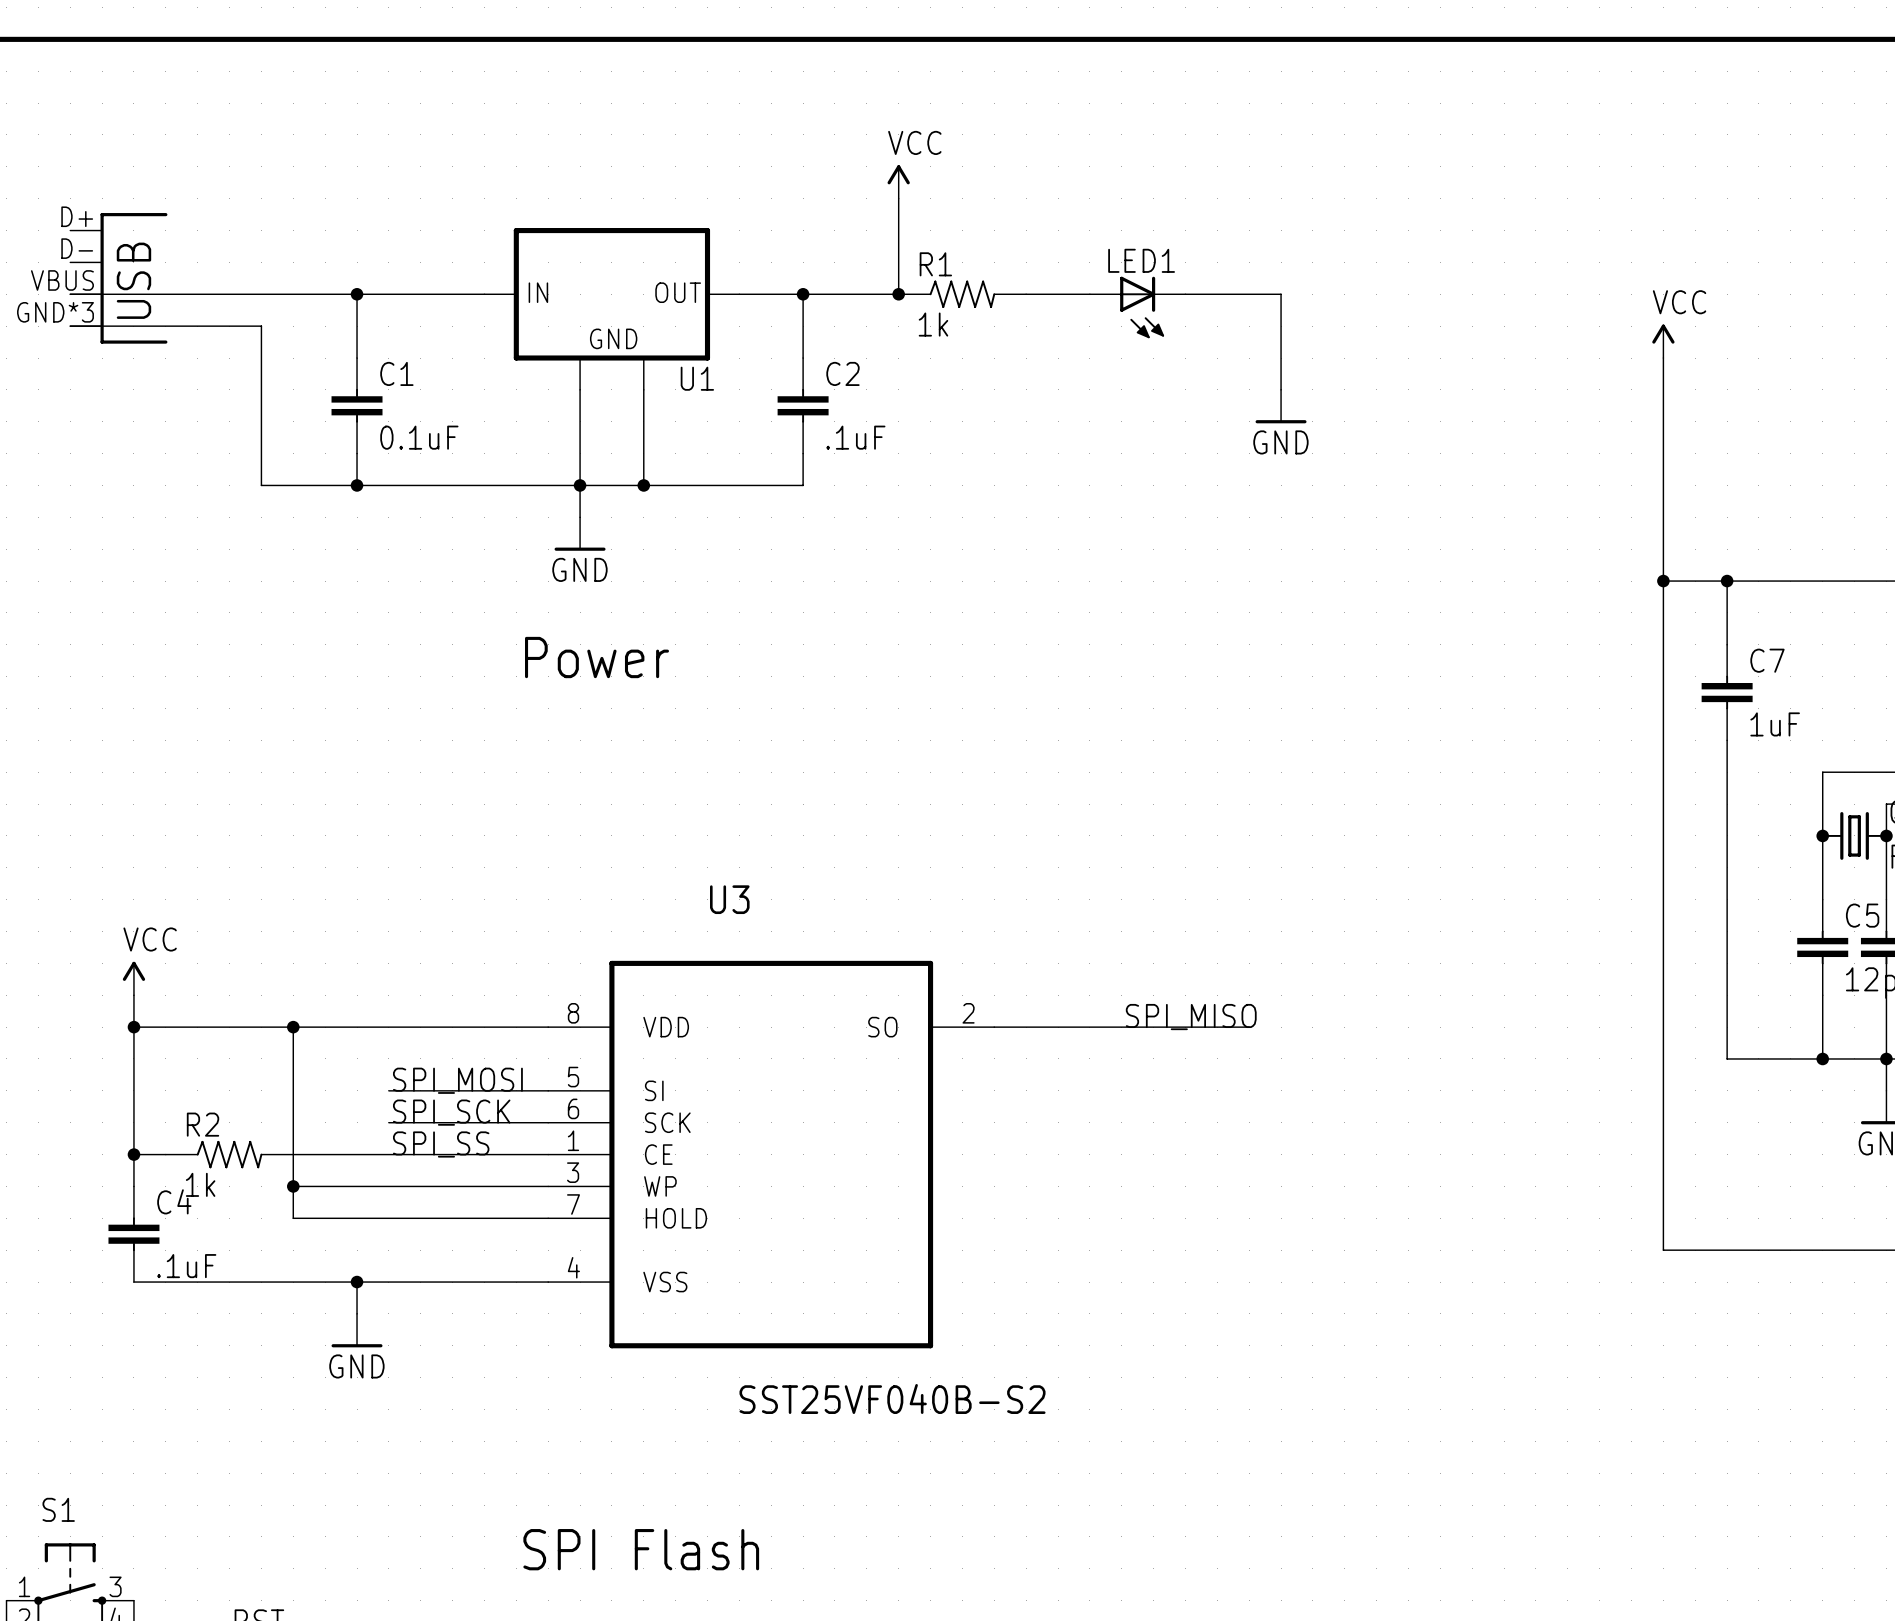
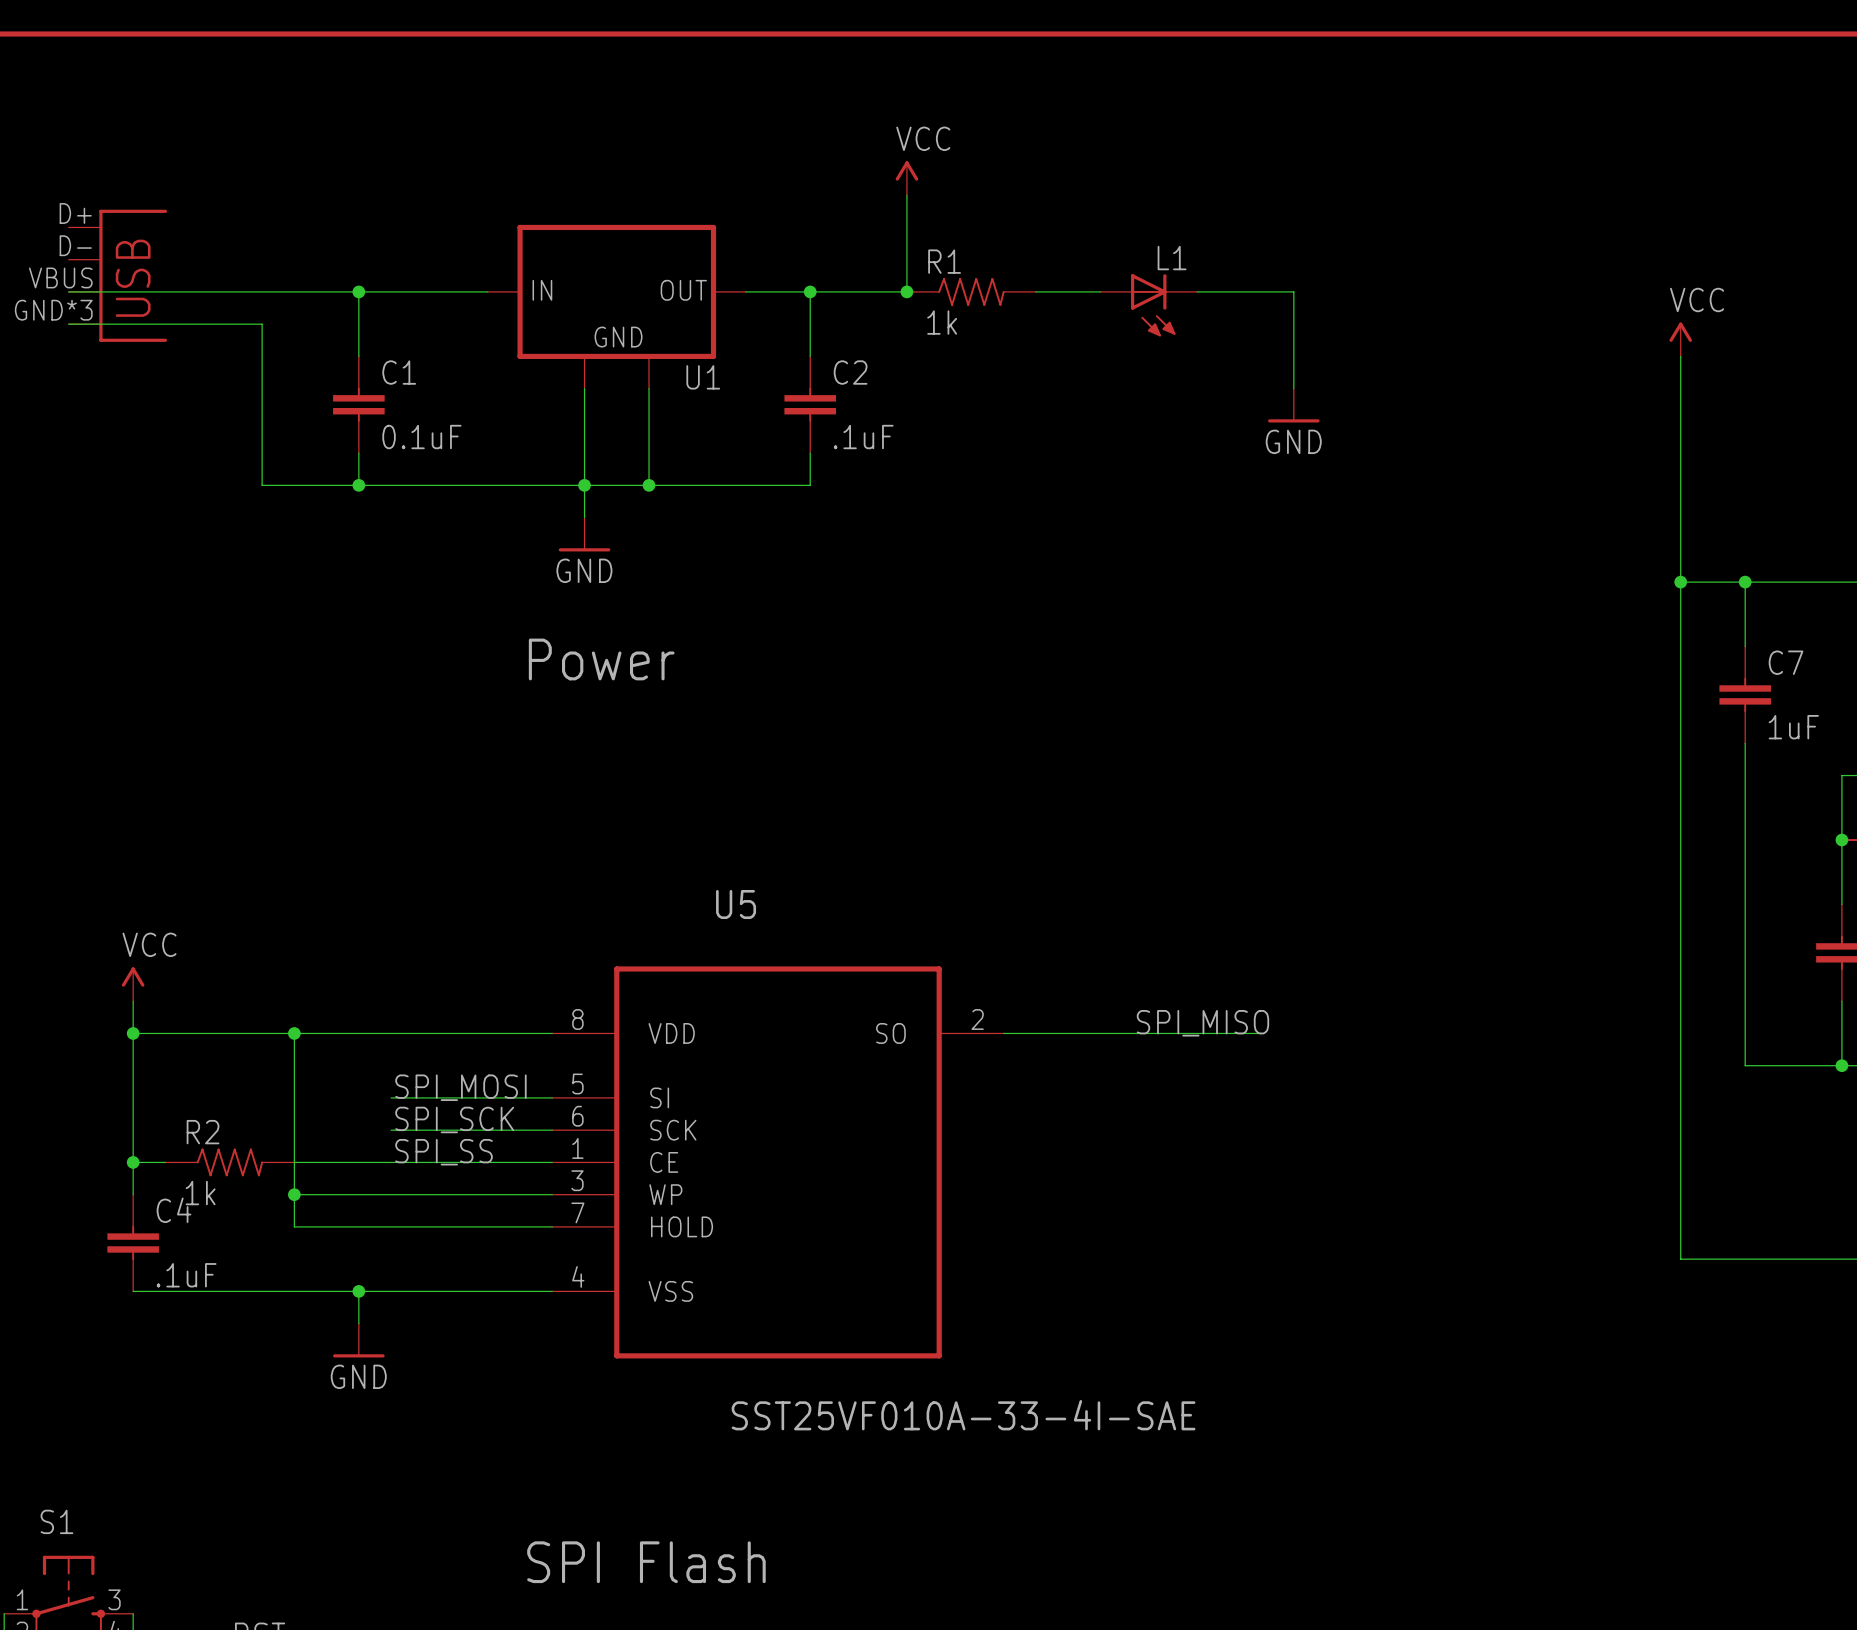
LED1 name: LED1 (1141, 260) -> L1 (1172, 258)
U3 name: U3 (729, 899) -> U5 (736, 904)
U3 value: SST25VF040B-S2 (892, 1398) -> SST25VF010A-33-4I-SAE (963, 1415)

